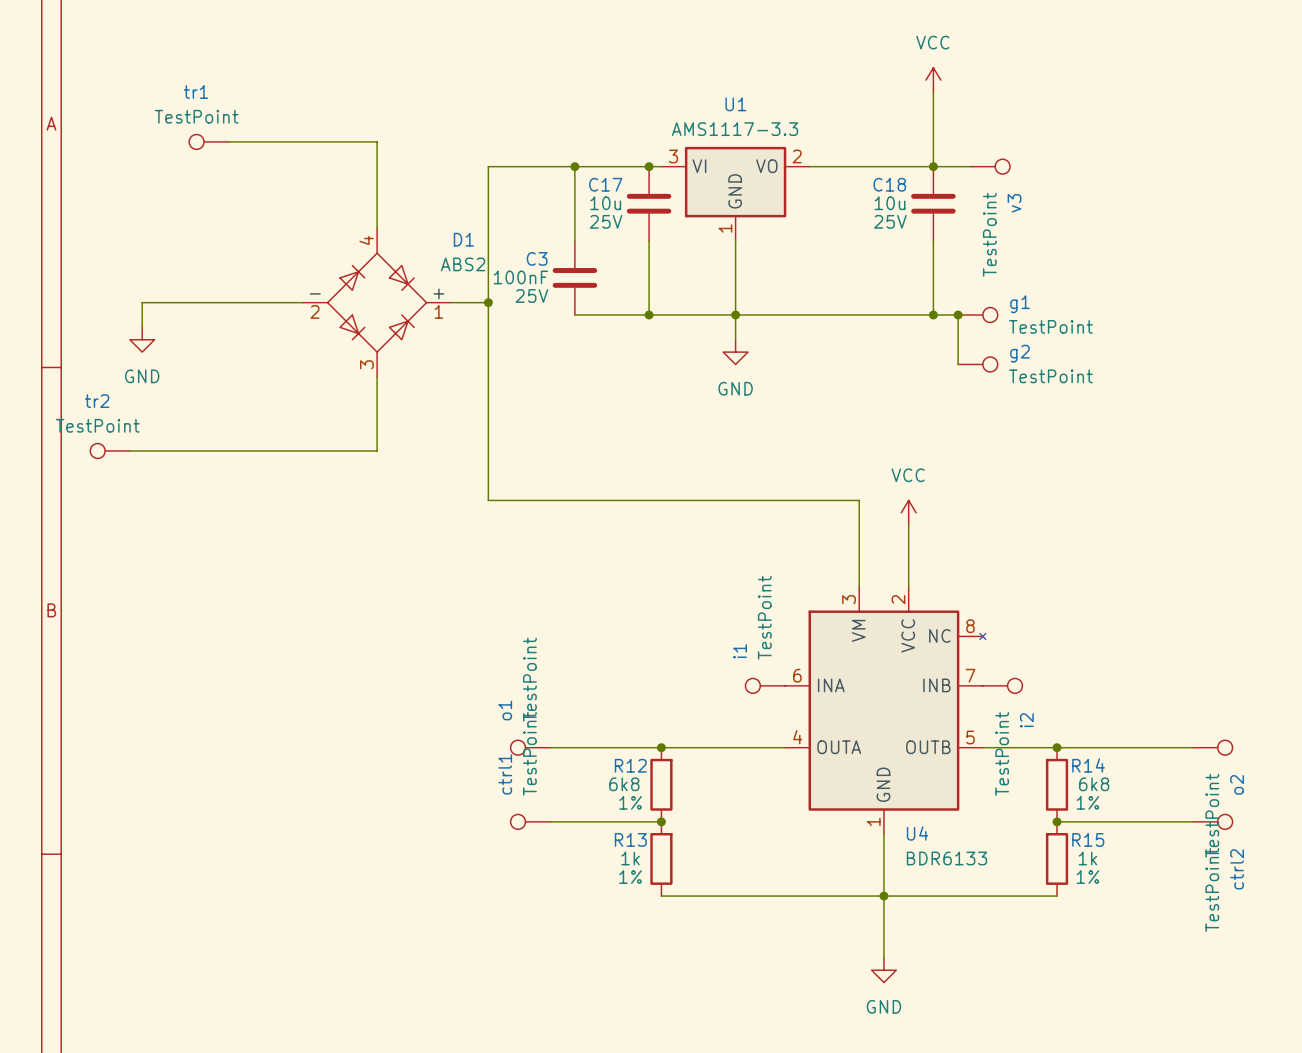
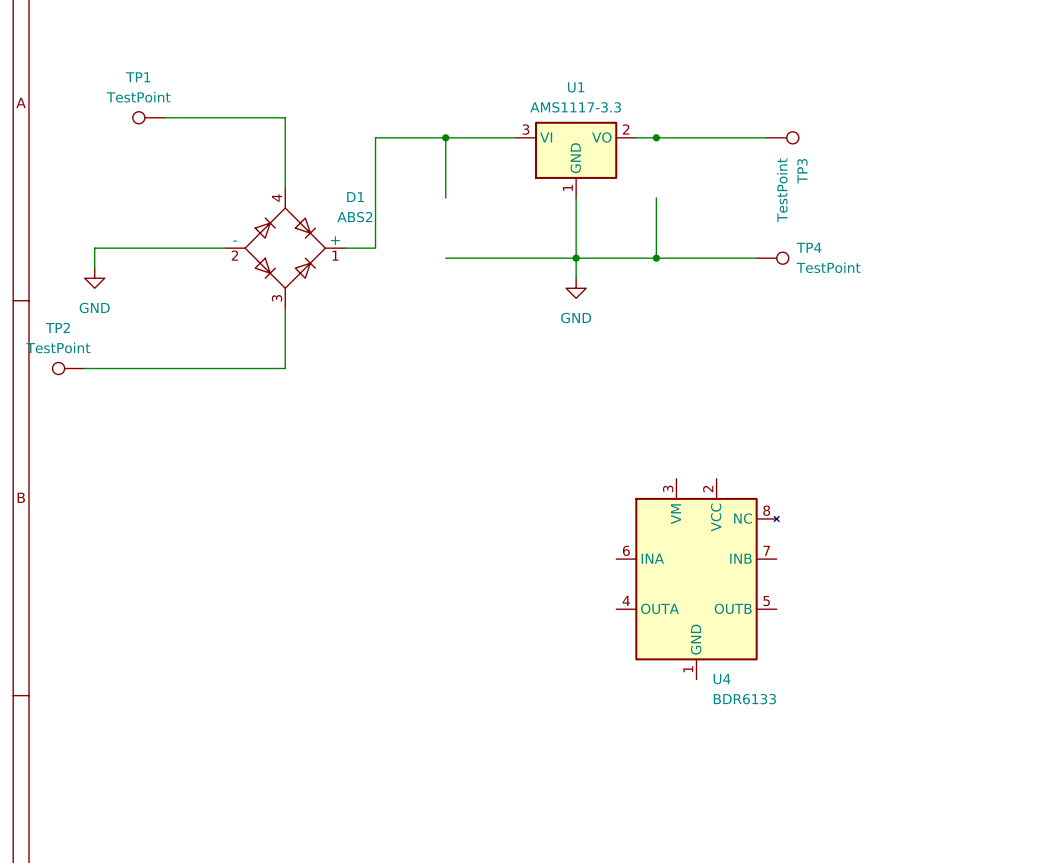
power symbol: VCC (933, 80) -> none
tr1 name: tr1 (196, 92) -> TP1 (138, 77)
wire: (933, 92) (933, 166) -> none
junction: (649, 166) -> none
junction: none -> (656, 137)
junction: (933, 166) -> none
C17: 10u (649, 203) -> none
C18: 10u (933, 203) -> none
v3 name: v3 (1014, 203) -> TP3 (802, 171)
wire: (649, 240) (649, 315) -> none
wire: (933, 240) (933, 315) -> (656, 198) (656, 258)
C3: 100nF (574, 277) -> none
wire: (488, 302) (488, 500) (859, 500) (859, 586) -> none
junction: (488, 302) -> none
g1 name: g1 (1020, 304) -> TP4 (809, 247)
junction: (649, 315) -> none
junction: none -> (656, 258)
junction: (933, 315) -> none
wire: (958, 315) (958, 364) -> none
junction: (958, 315) -> none
g2: TestPoint (977, 364) -> none
tr2 name: tr2 (97, 401) -> TP2 (57, 327)
power symbol: VCC (908, 512) -> none
wire: (908, 525) (908, 586) -> none
i1: TestPoint (765, 685) -> none
i2: TestPoint (1002, 685) -> none
o1: TestPoint (530, 747) -> none
wire: (550, 747) (785, 747) -> none
junction: (661, 747) -> none
wire: (982, 747) (1193, 747) -> none
junction: (1057, 747) -> none
o2: TestPoint (1212, 747) -> none
R12: 6k8 (661, 784) -> none
R14: 6k8 (1057, 784) -> none
ctrl1: TestPoint (530, 821) -> none
wire: (550, 821) (661, 821) -> none
junction: (661, 821) -> none
wire: (1057, 821) (1193, 821) -> none
junction: (1057, 821) -> none
ctrl2: TestPoint (1212, 821) -> none
wire: (883, 834) (883, 957) -> none
R13: 1k (661, 858) -> none
R15: 1k (1057, 858) -> none
wire: (661, 896) (1057, 896) -> none
junction: (883, 896) -> none
power symbol: GND (883, 970) -> none

